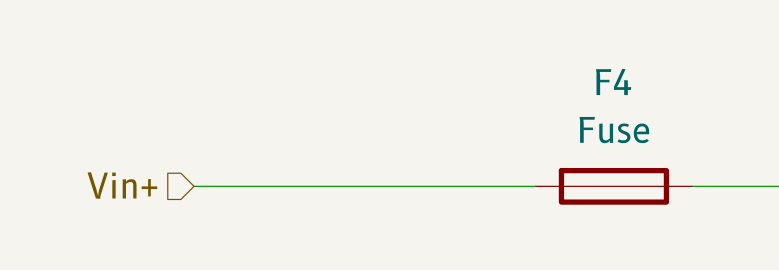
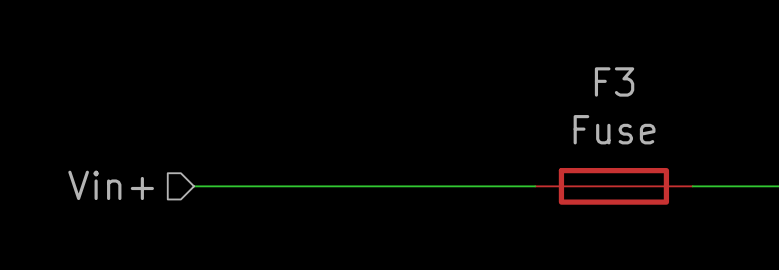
F4 name: F4 (613, 81) -> F3 (614, 81)

